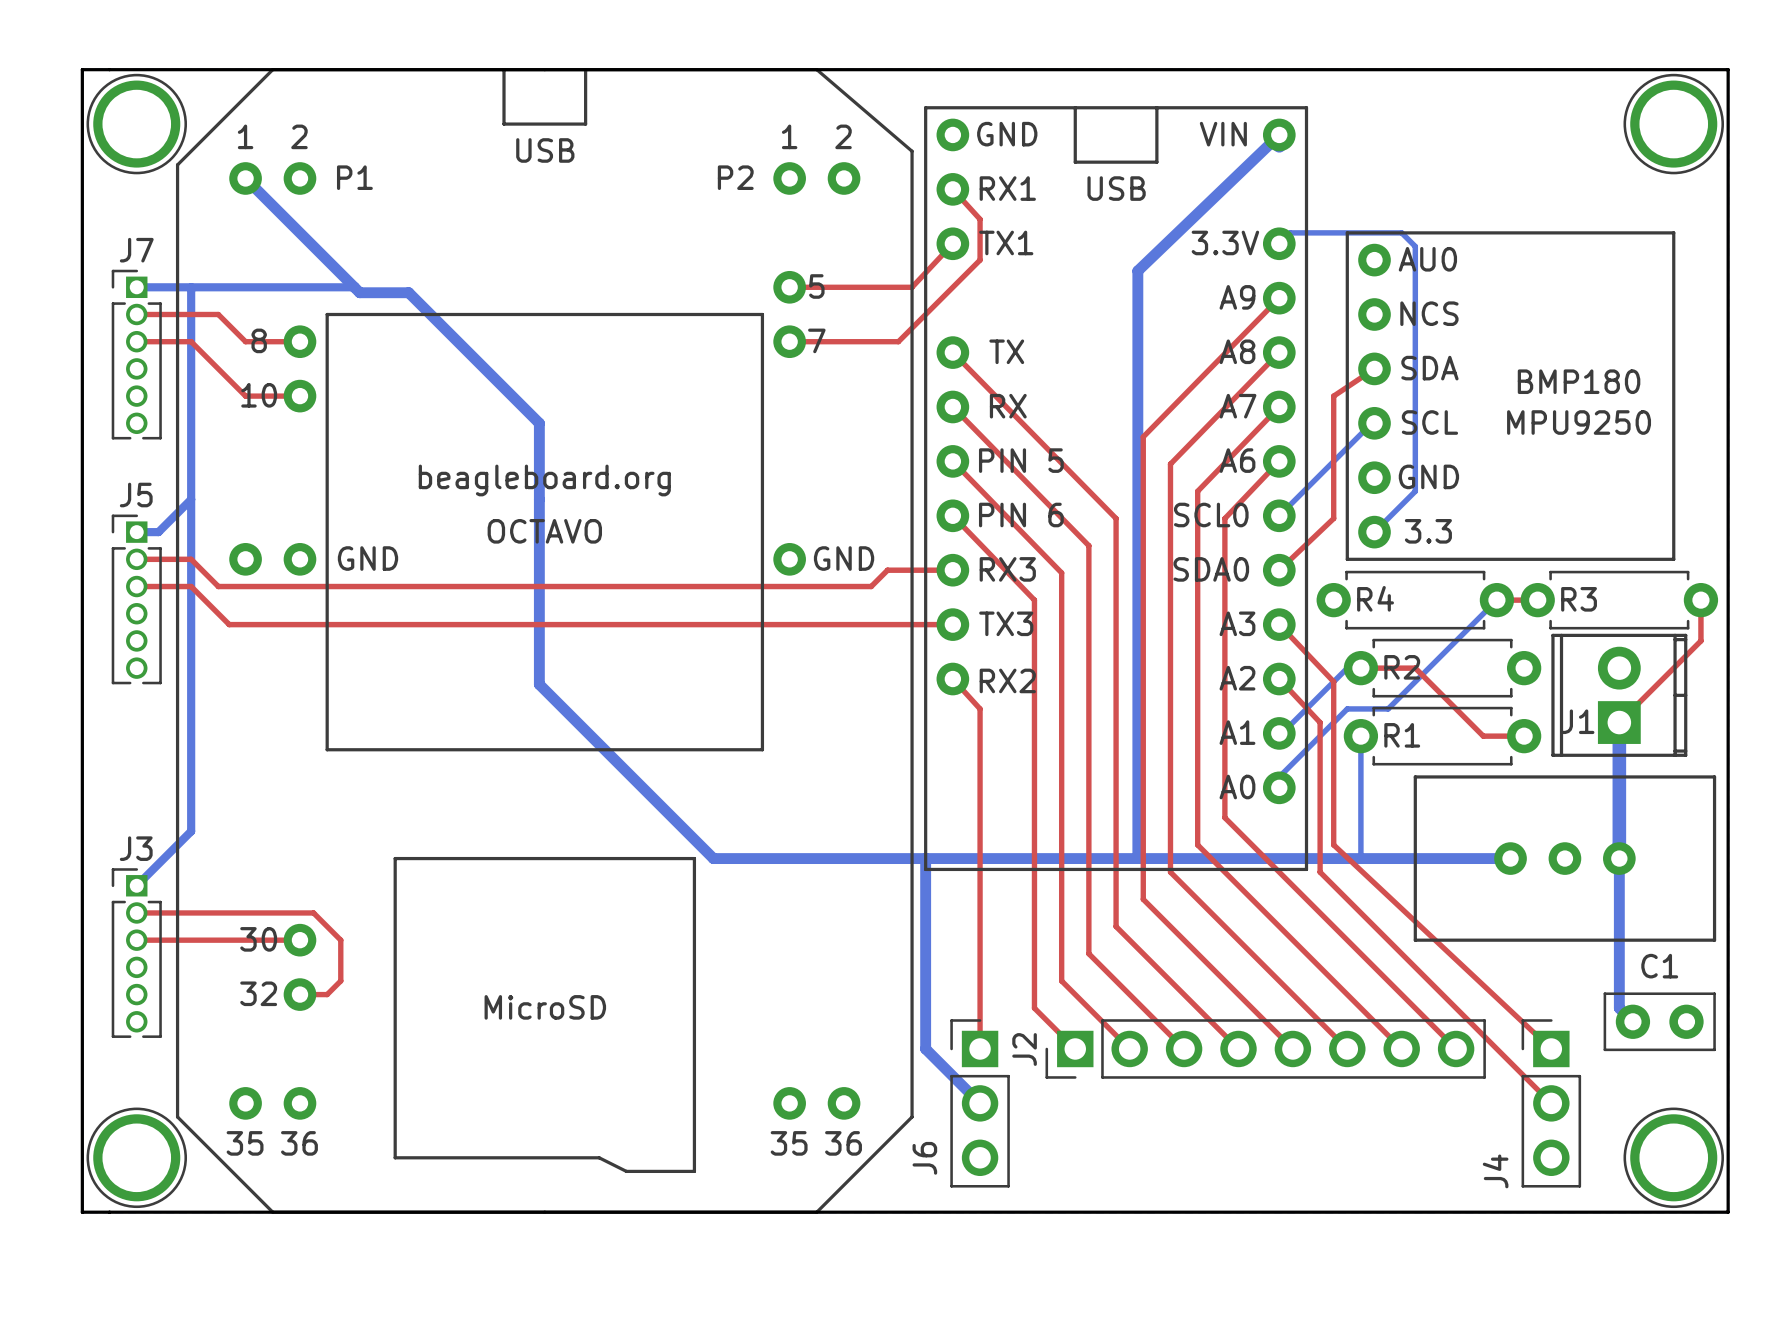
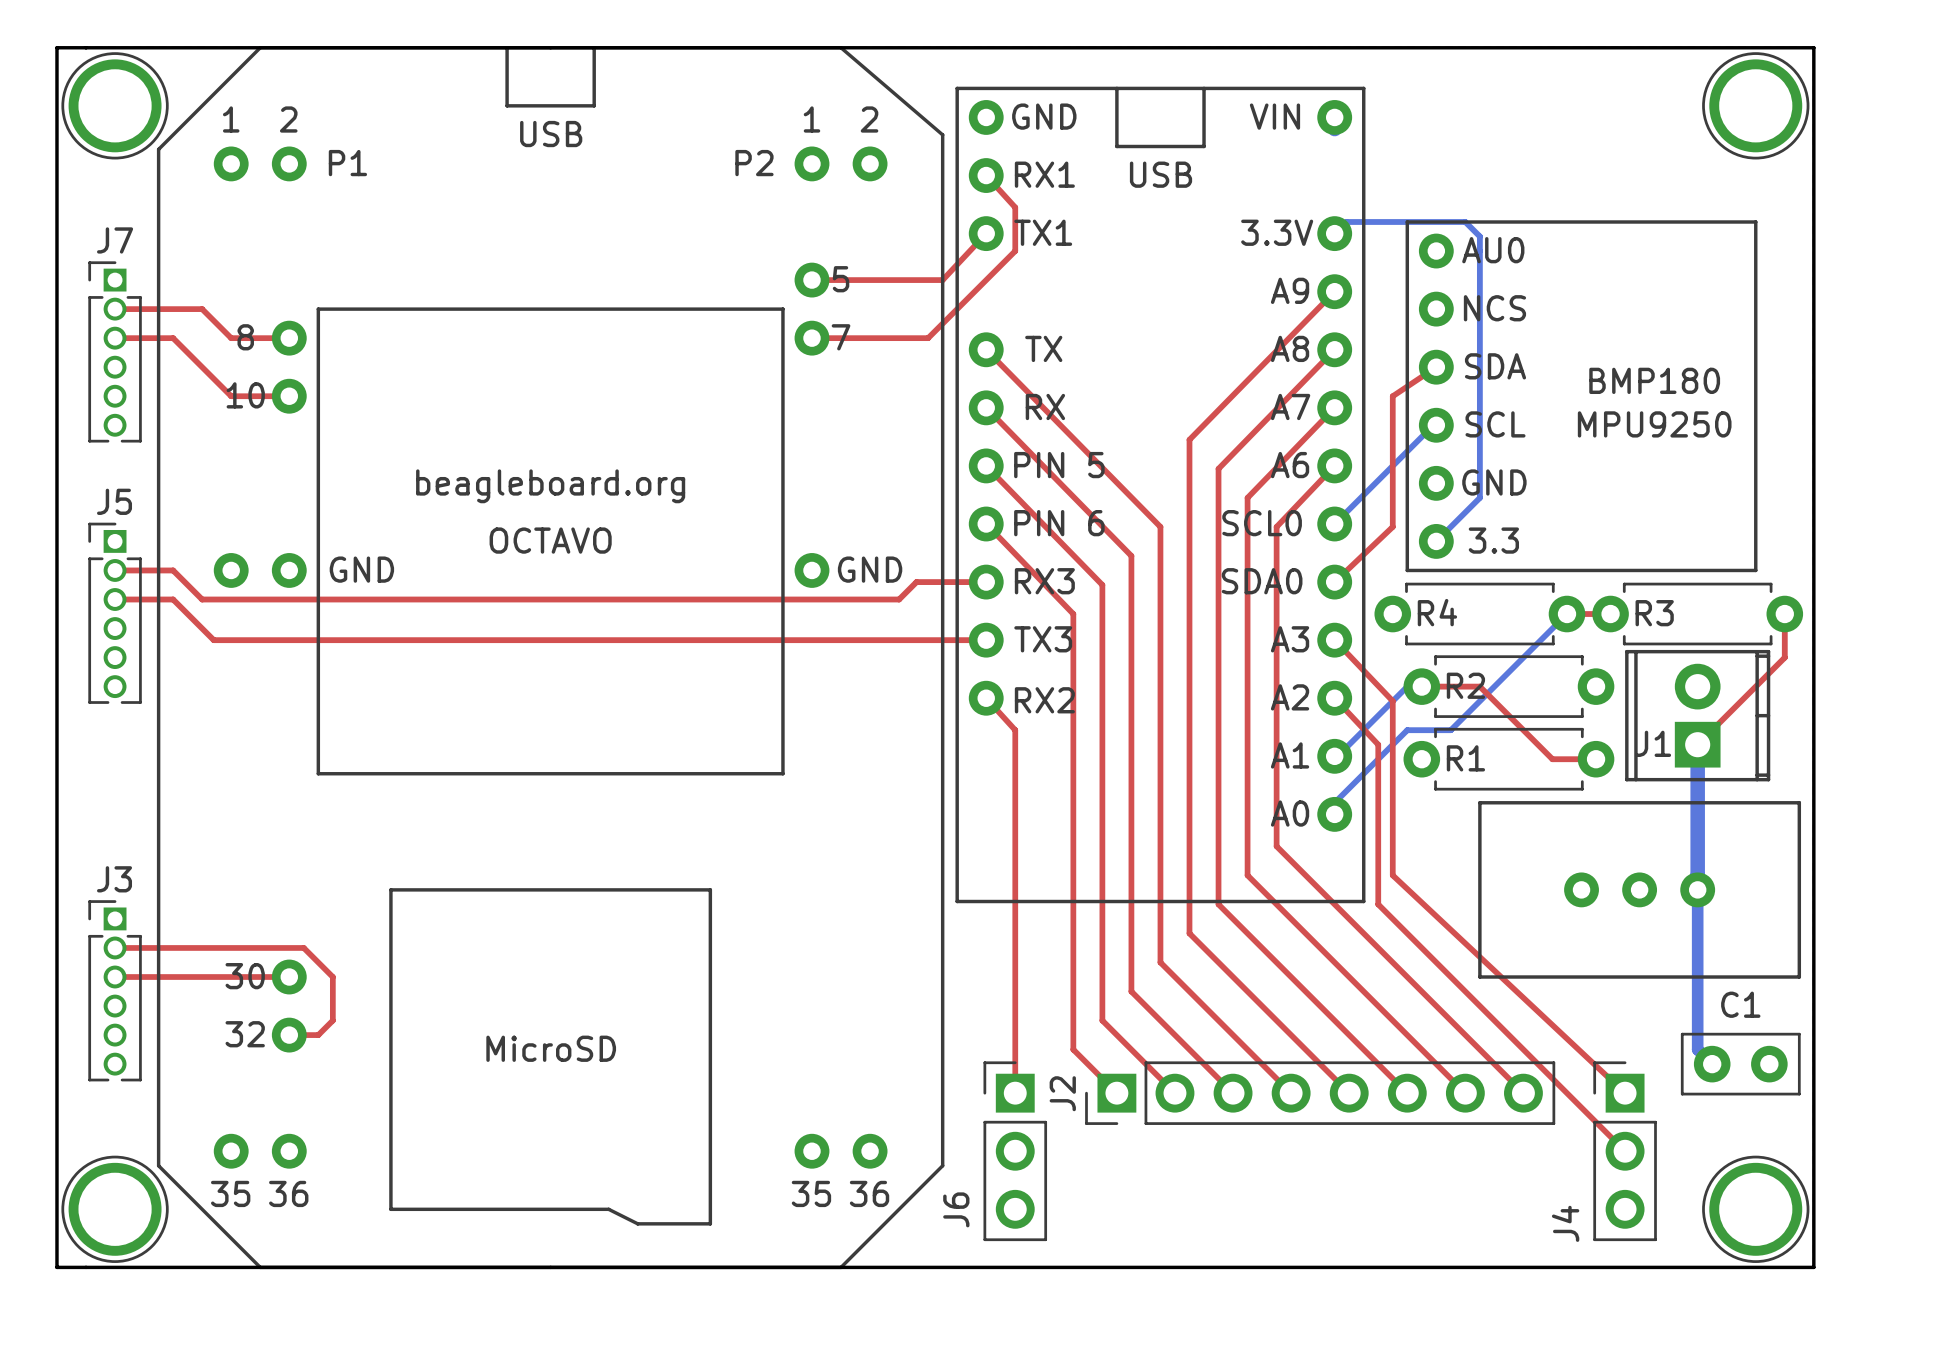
bottom track: (1273, 140) (1137, 270) (1137, 858) -> none
bottom track: (245, 178) (359, 292) (408, 292) (539, 423) (539, 684) (713, 858) (1510, 858) -> none
bottom track: (136, 287) (354, 287) -> none
bottom track: (191, 287) (191, 831) (136, 885) -> none
bottom track: (191, 499) (158, 532) (136, 532) -> none
bottom track: (1360, 749) (1360, 858) -> none
bottom track: (925, 858) (925, 1048) (980, 1103) -> none

